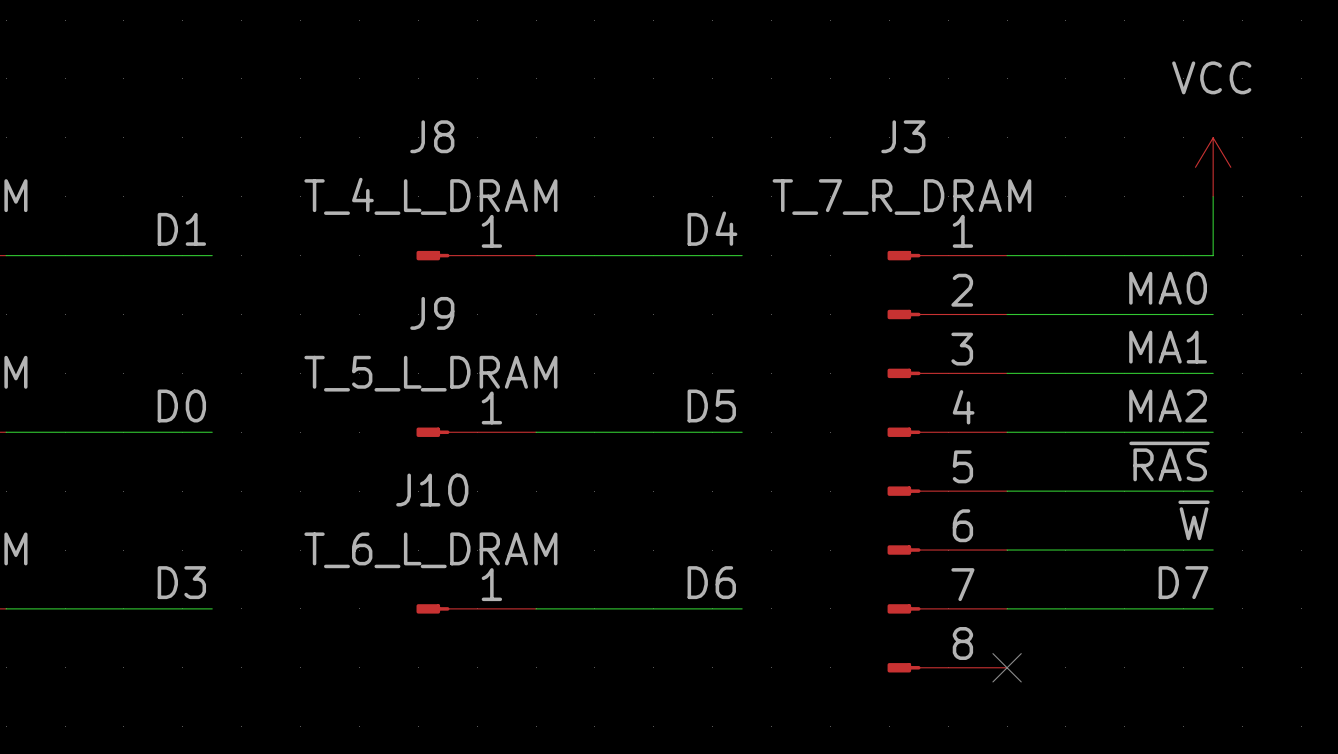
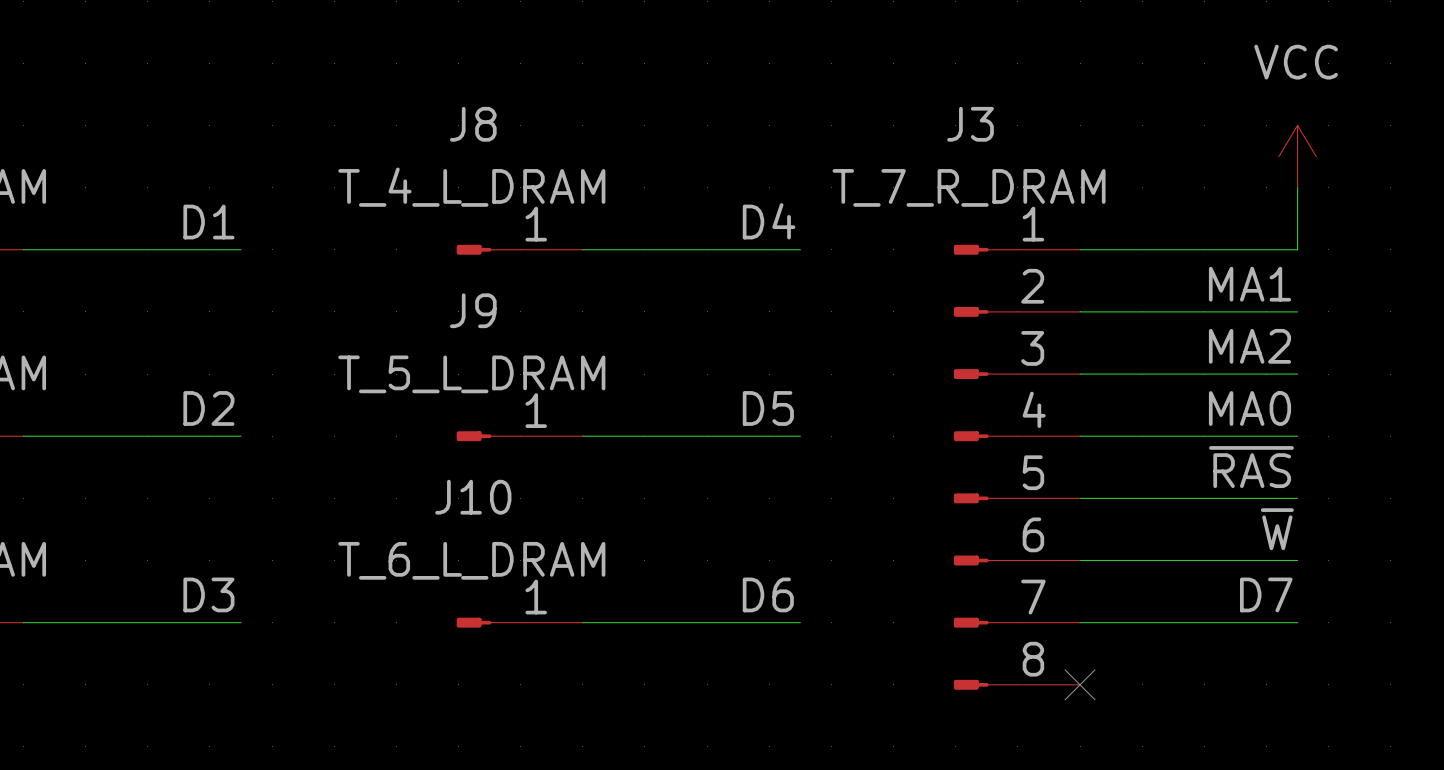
label: MA0 (1168, 288) -> MA1 (1249, 284)
label: MA1 (1168, 347) -> MA2 (1249, 346)
label: D0 (181, 405) -> D2 (208, 408)
label: MA2 (1168, 405) -> MA0 (1249, 408)

